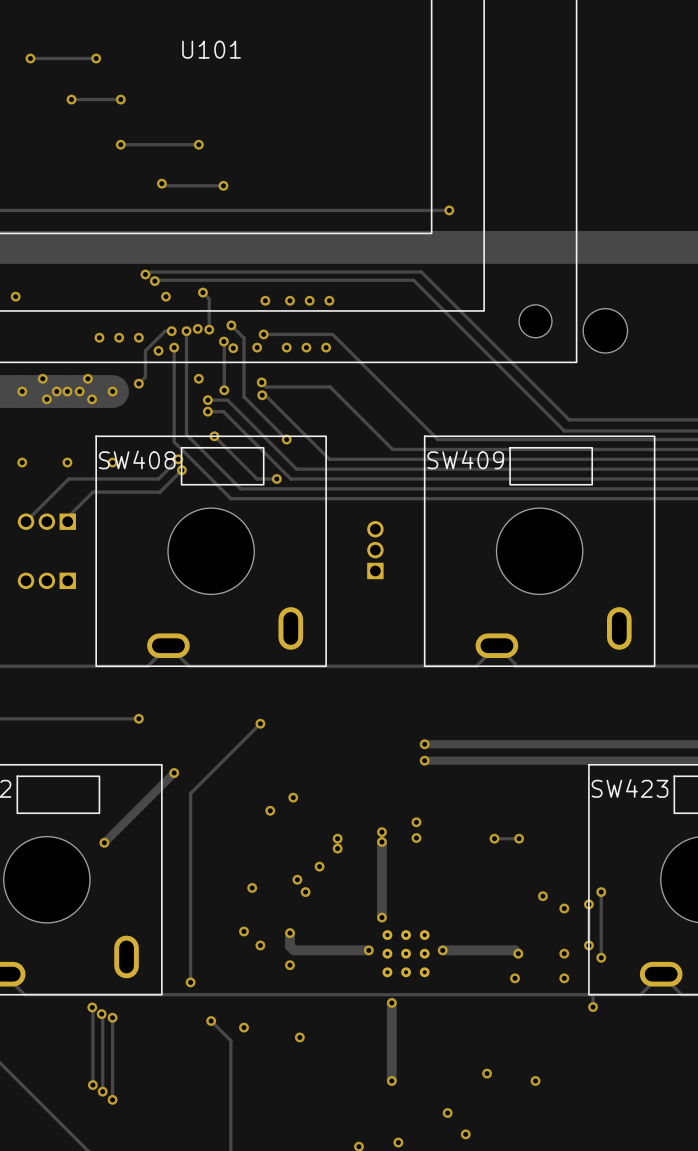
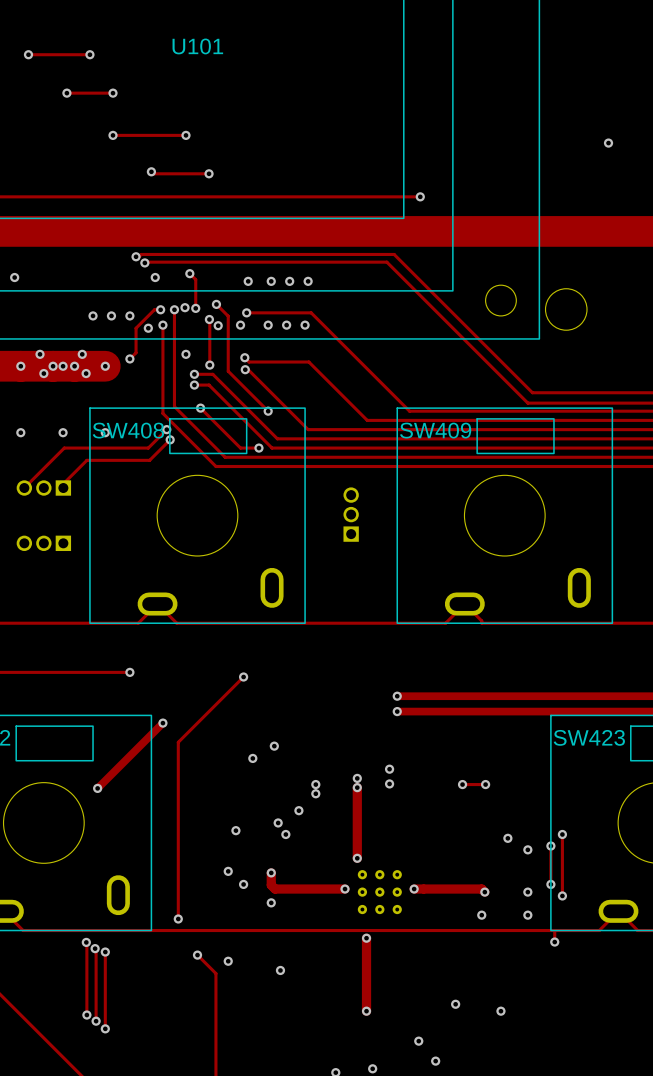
via: none -> (608, 143)

